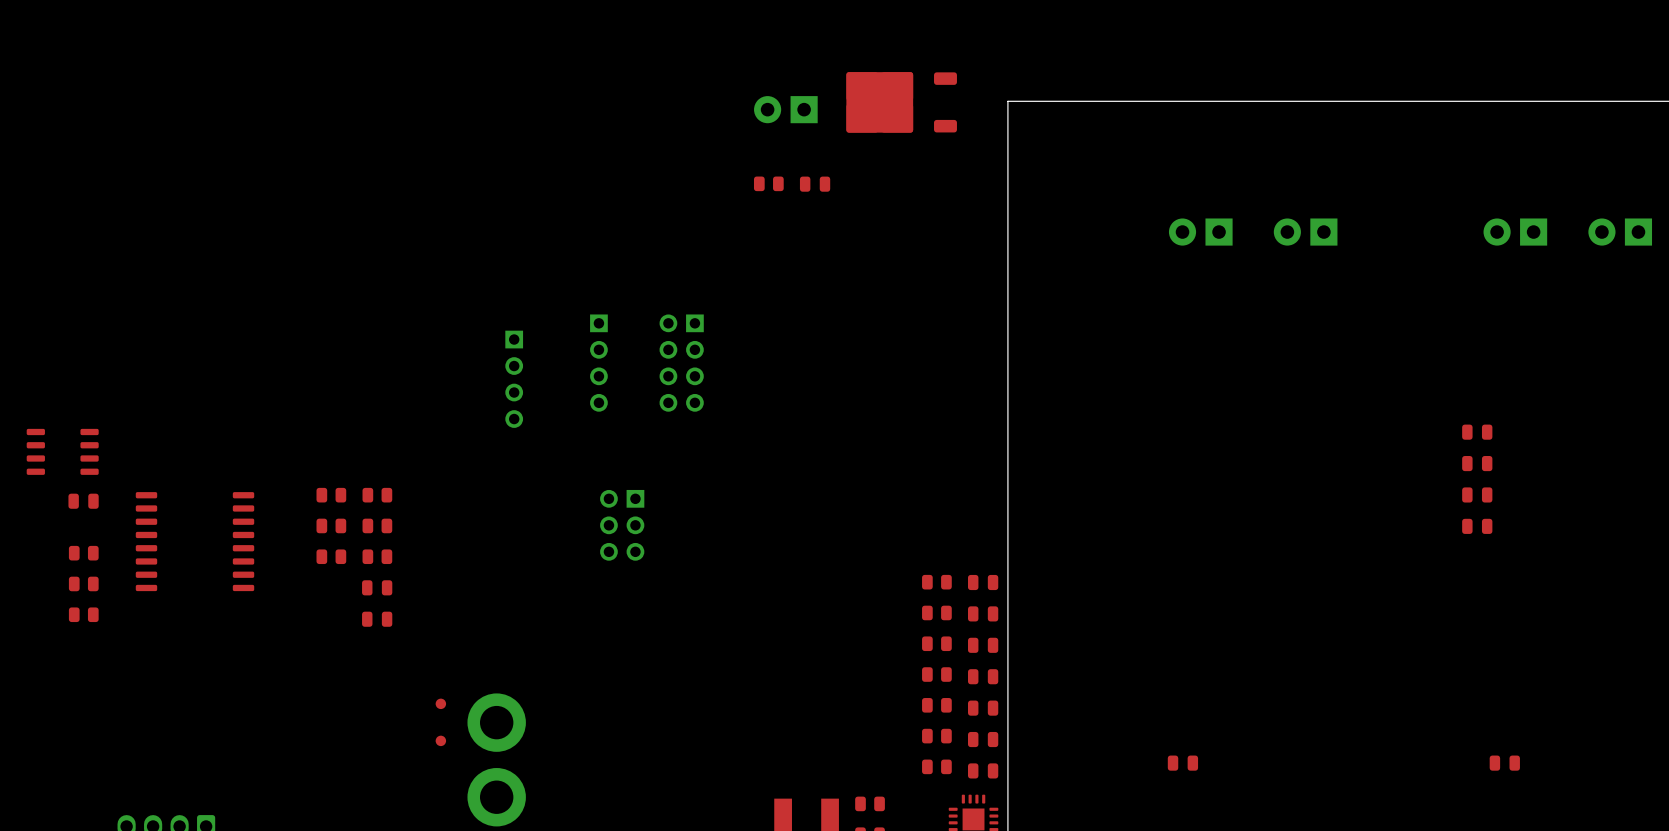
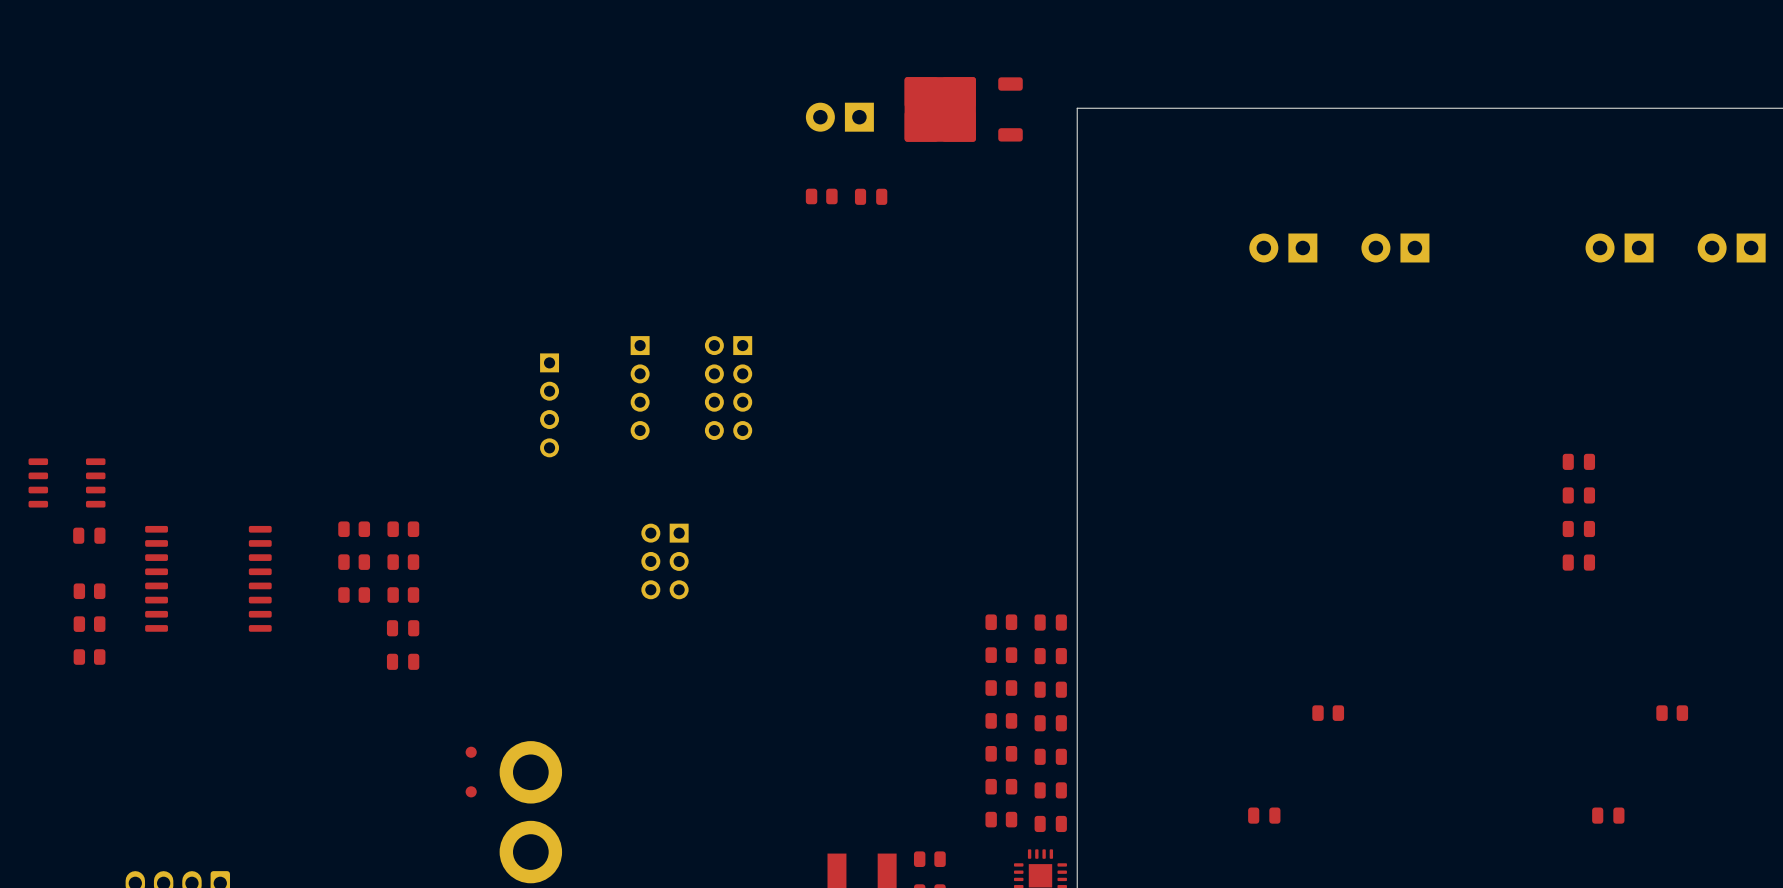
part: none -> (1328, 713)
part: none -> (1672, 713)

